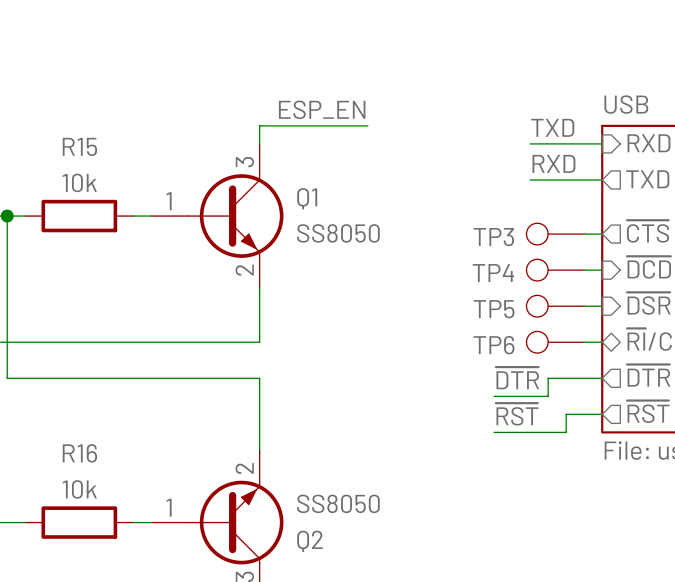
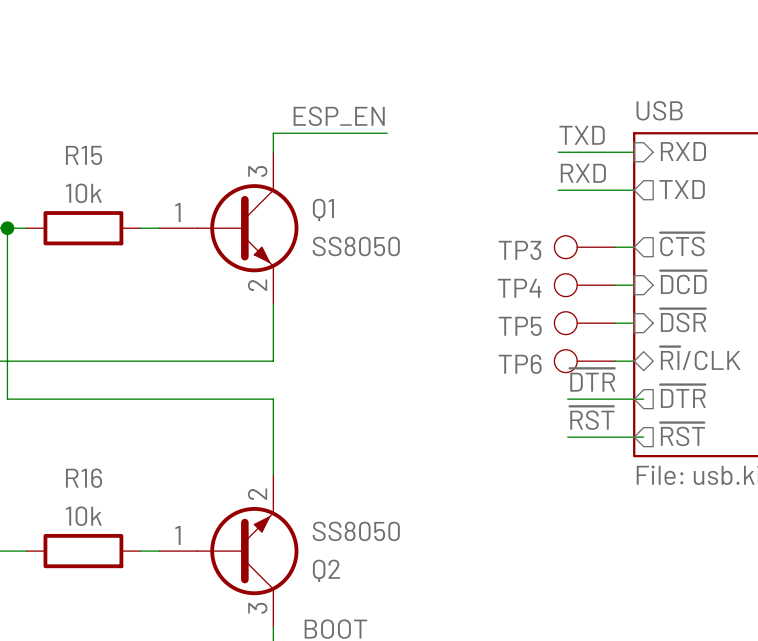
label position: ~{DTR} (517, 378) -> ~{DTR} (592, 380)
wire: (548, 378) (548, 396) (494, 396) -> (577, 399) (567, 399)
wire: none -> (634, 399) (643, 399)
label position: ~{RST} (517, 414) -> ~{RST} (592, 418)
wire: (566, 414) (566, 432) (494, 432) -> (596, 437) (567, 437)
wire: none -> (634, 437) (643, 437)

